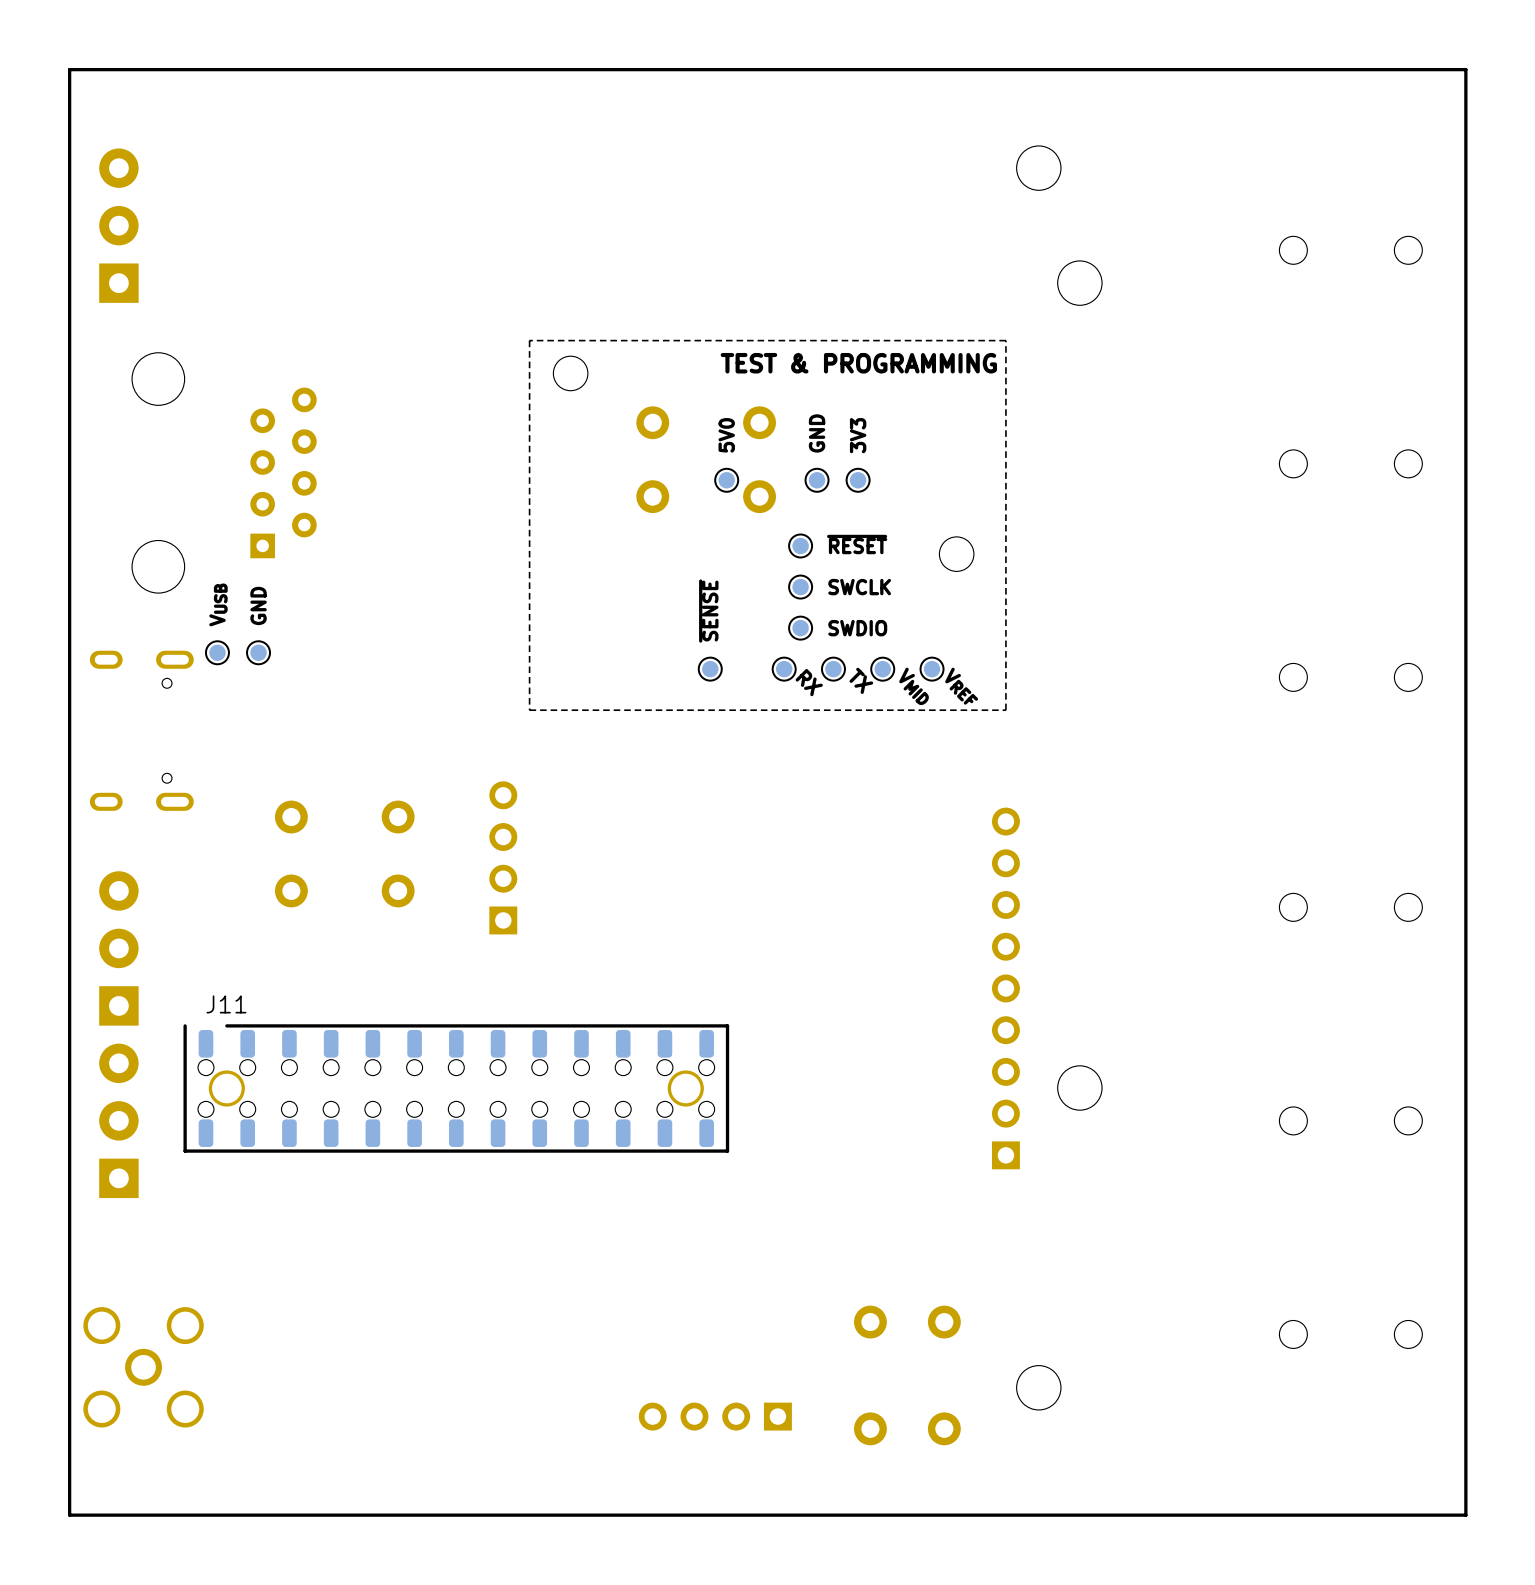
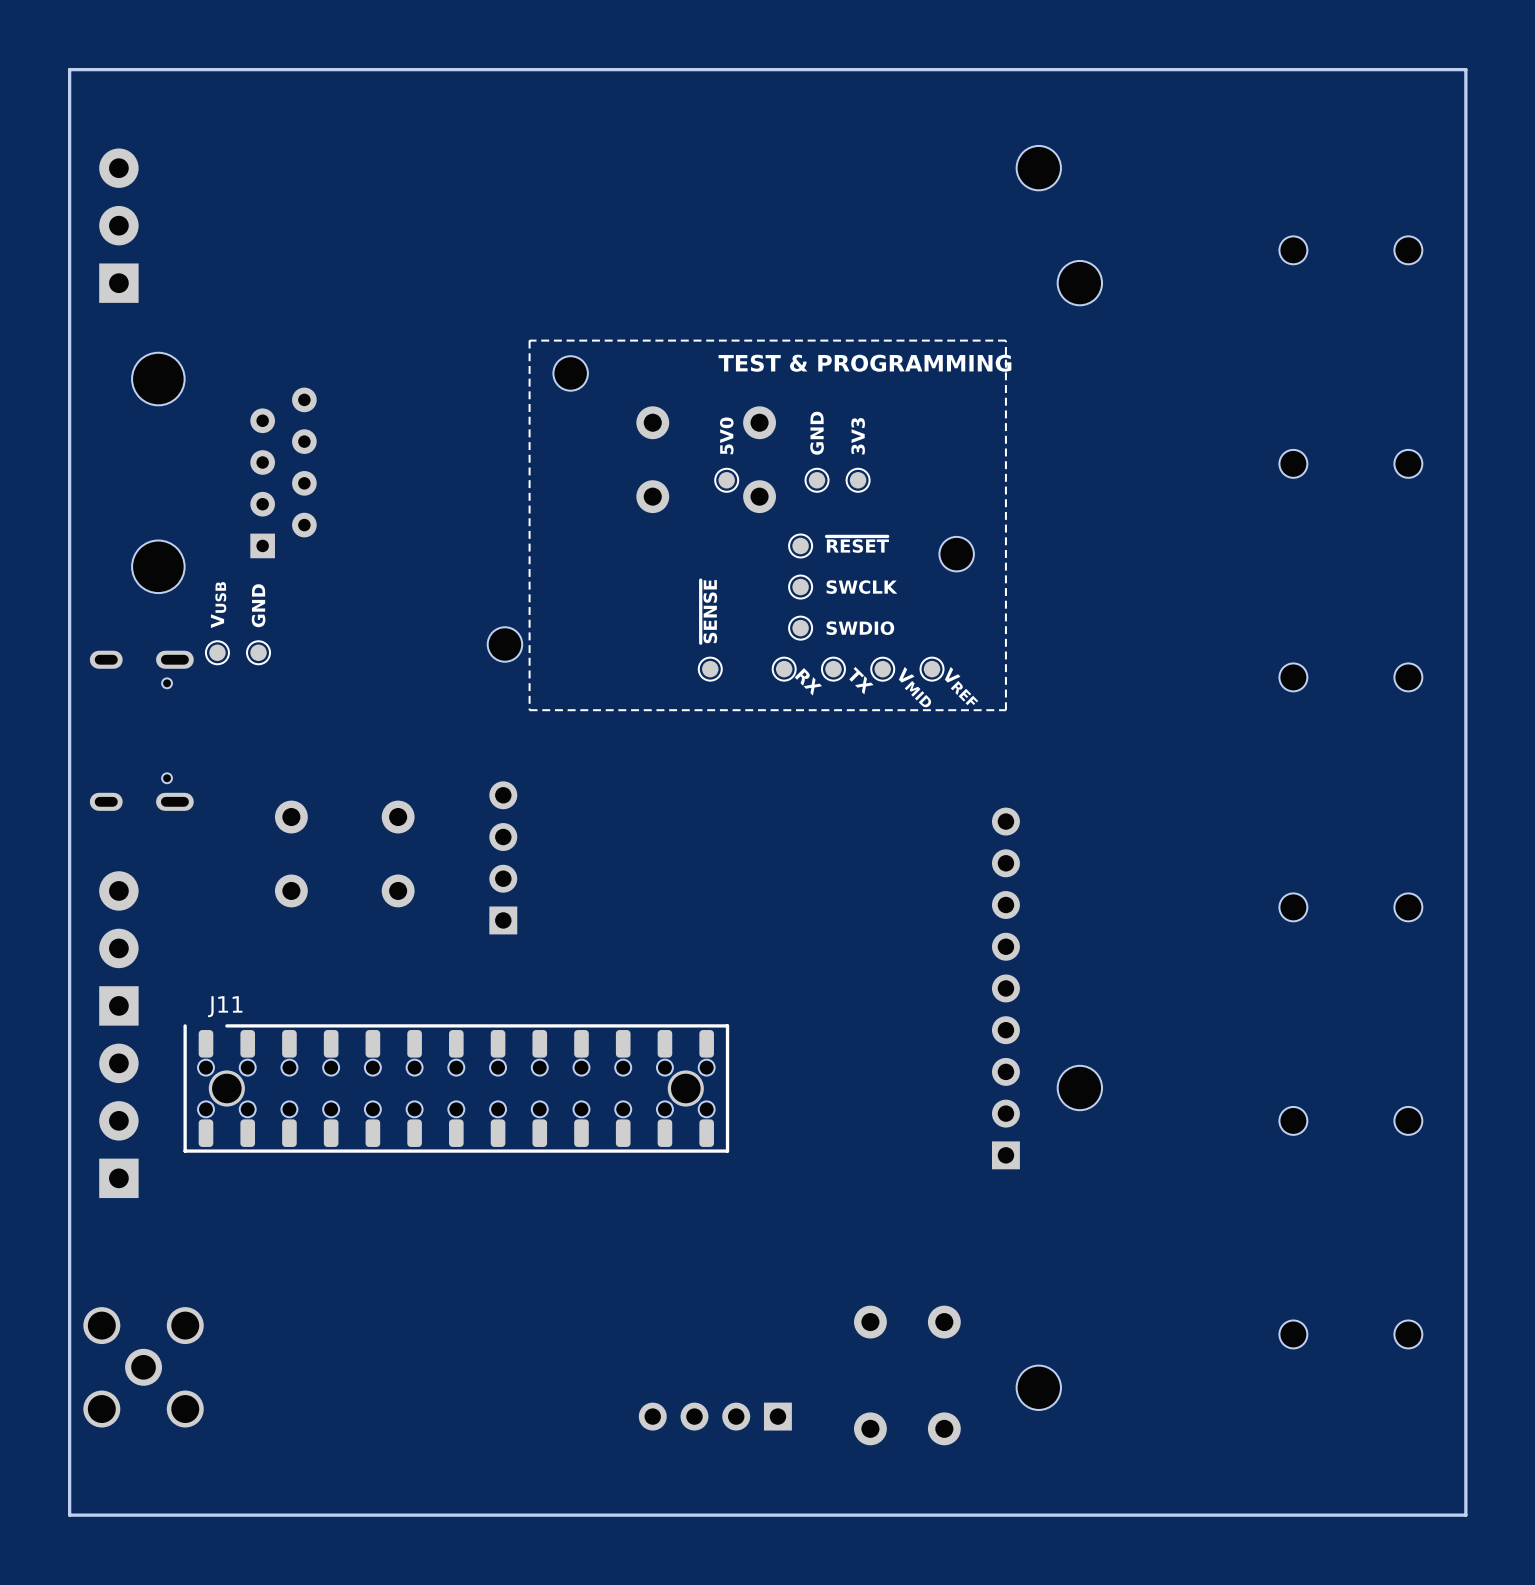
part: none -> (504, 644)

